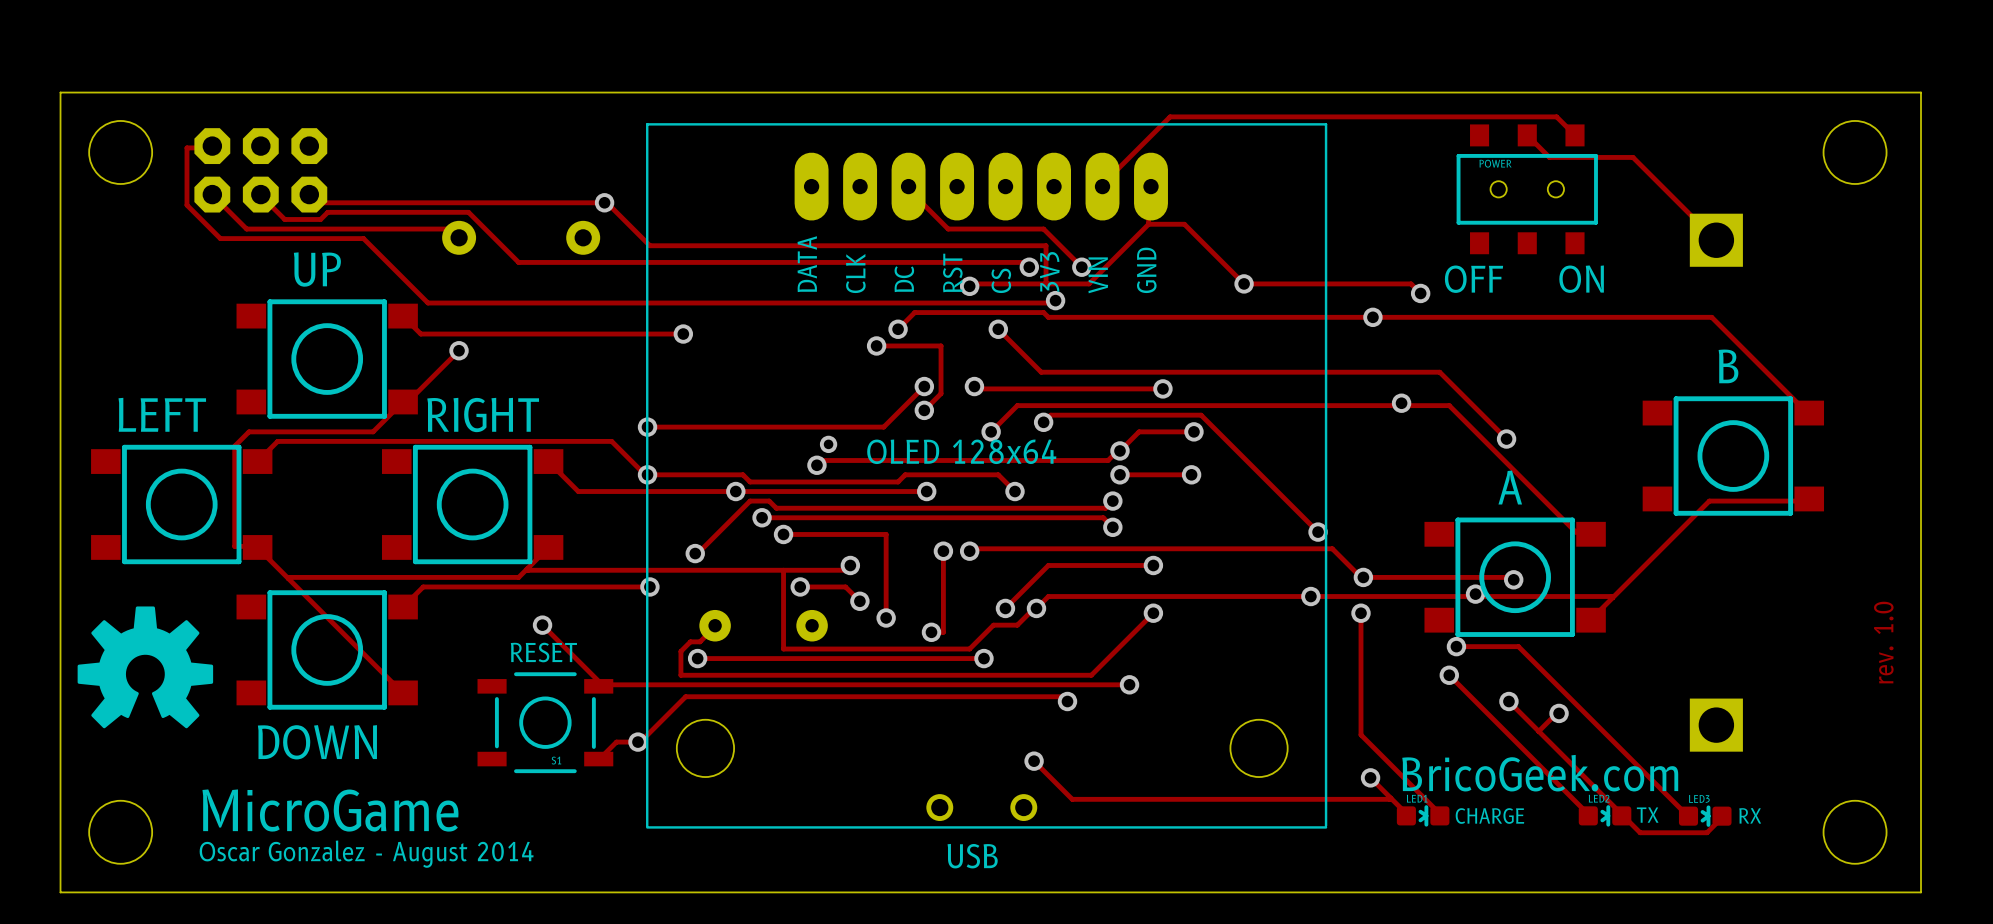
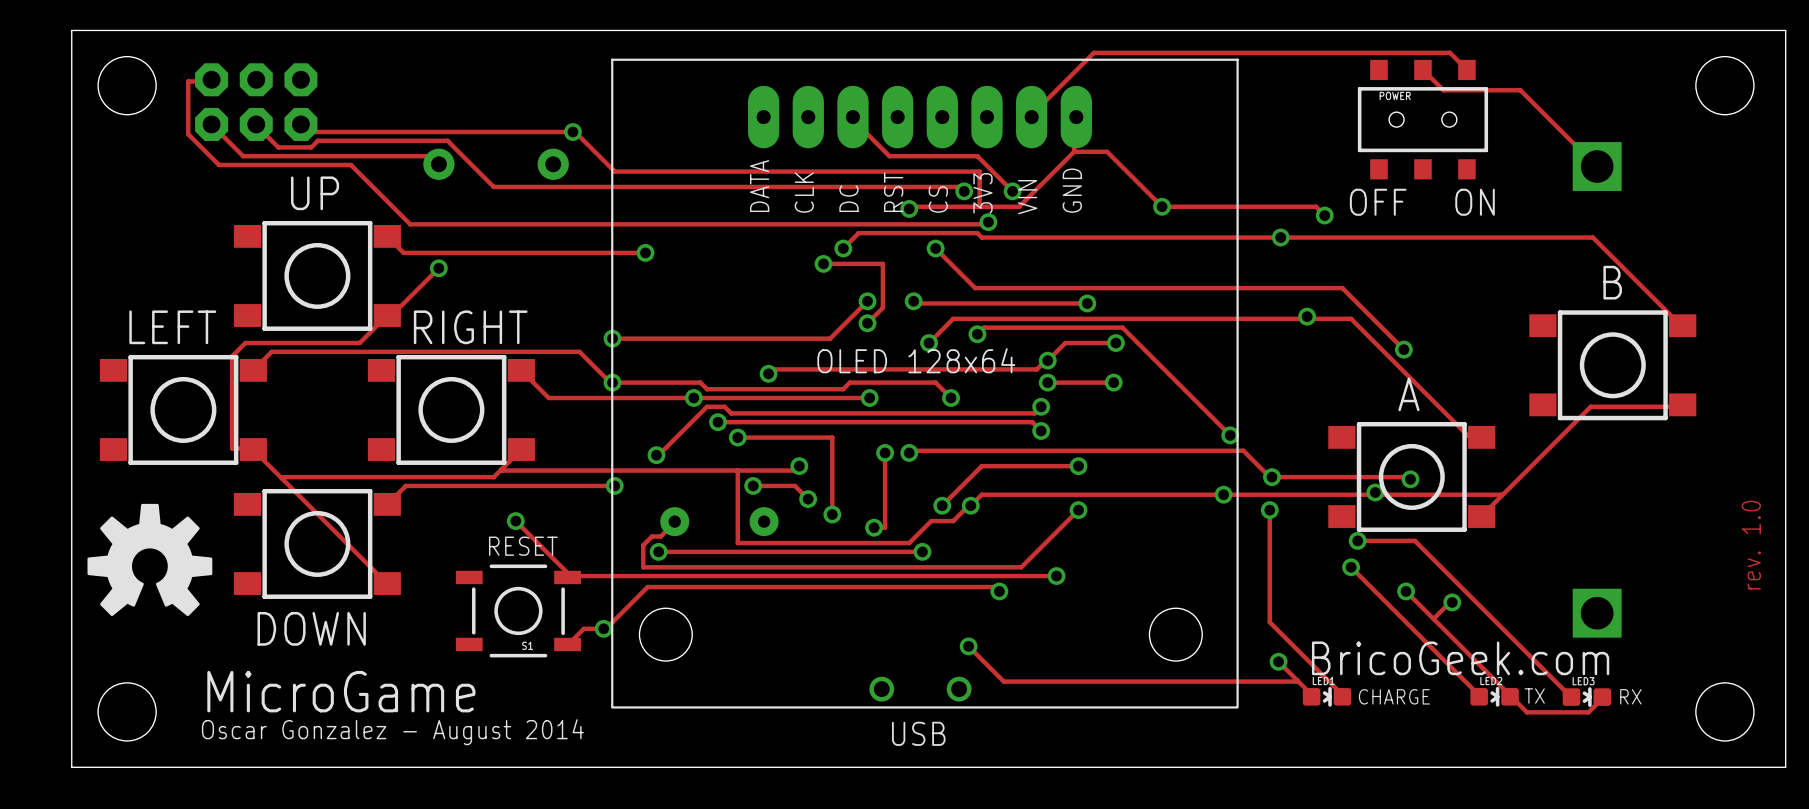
via: (828, 444) -> none

